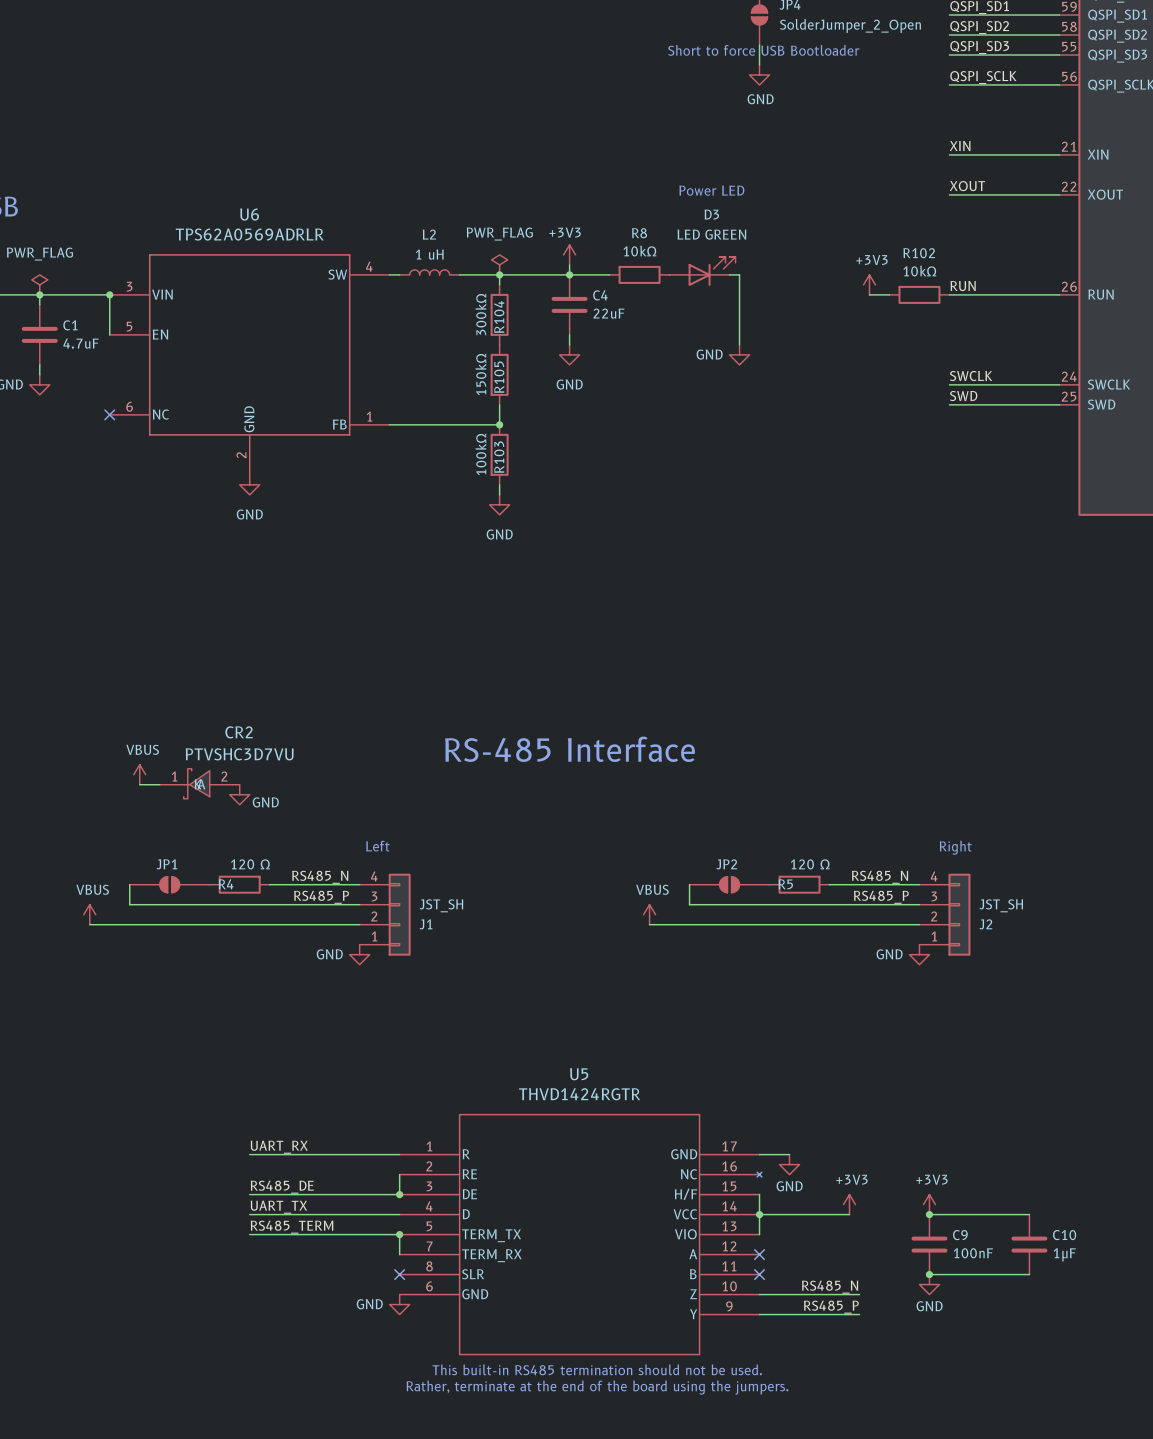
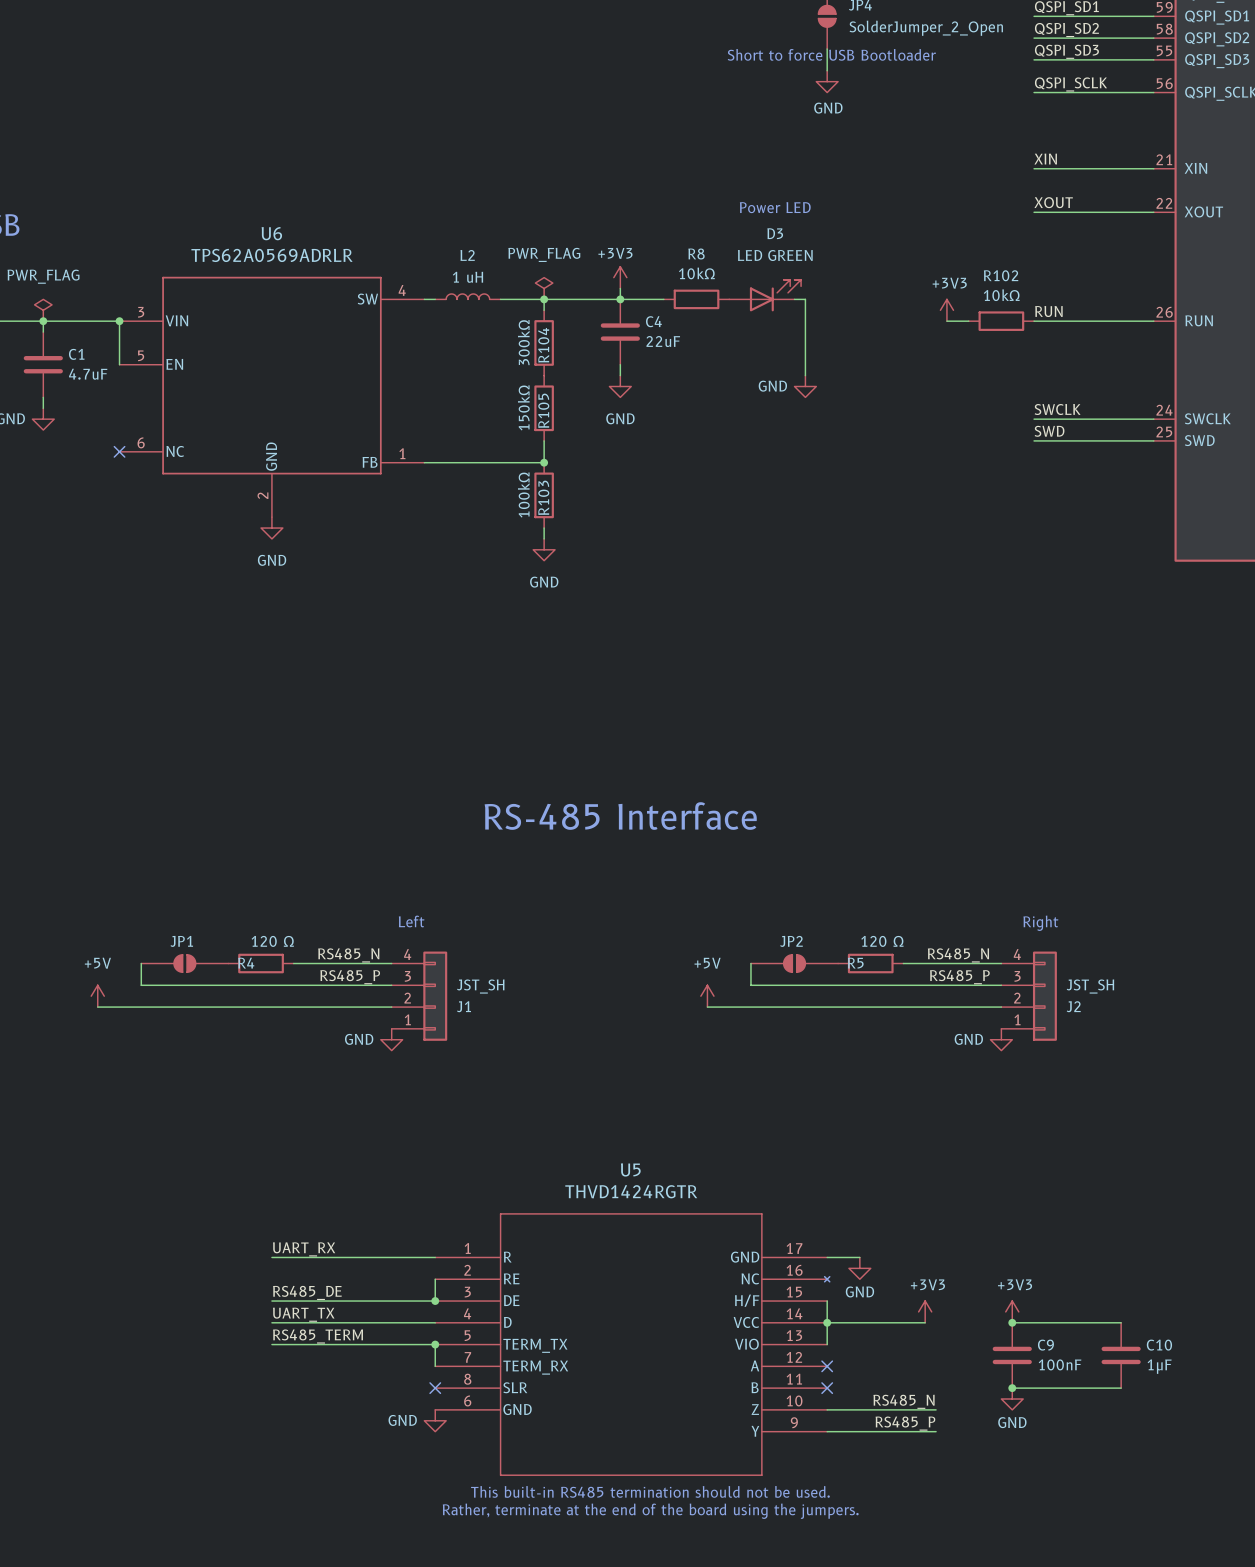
power symbol: VBUS (139, 774) -> none
CR2: PTVSHC3D7VU (199, 783) -> none
wire: (139, 784) (159, 784) -> none
power symbol: GND (239, 794) -> none
power symbol: VBUS (89, 914) -> +5V (97, 996)
power symbol: VBUS (649, 914) -> +5V (707, 996)

